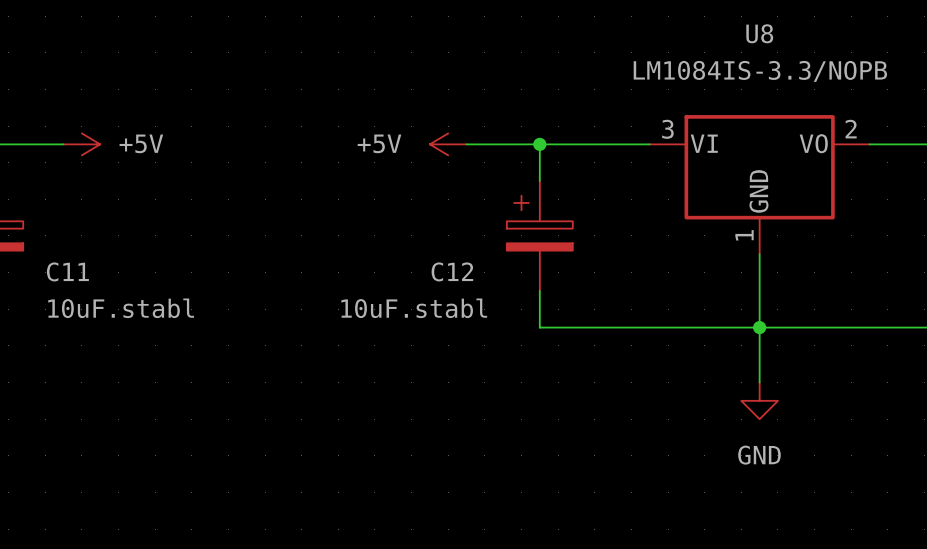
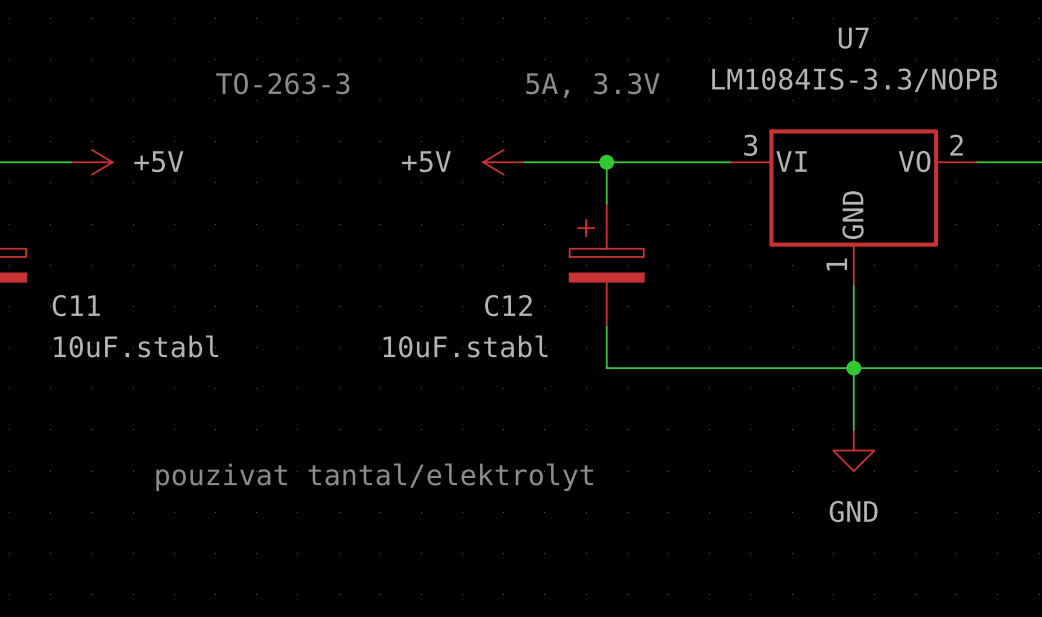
U8 name: U8 (759, 33) -> U7 (853, 38)
text: none -> TO-263-3 (282, 83)
text: none -> 5A, 3.3V (592, 85)
text: none -> pouzivat tantal/elektrolyt (374, 477)

